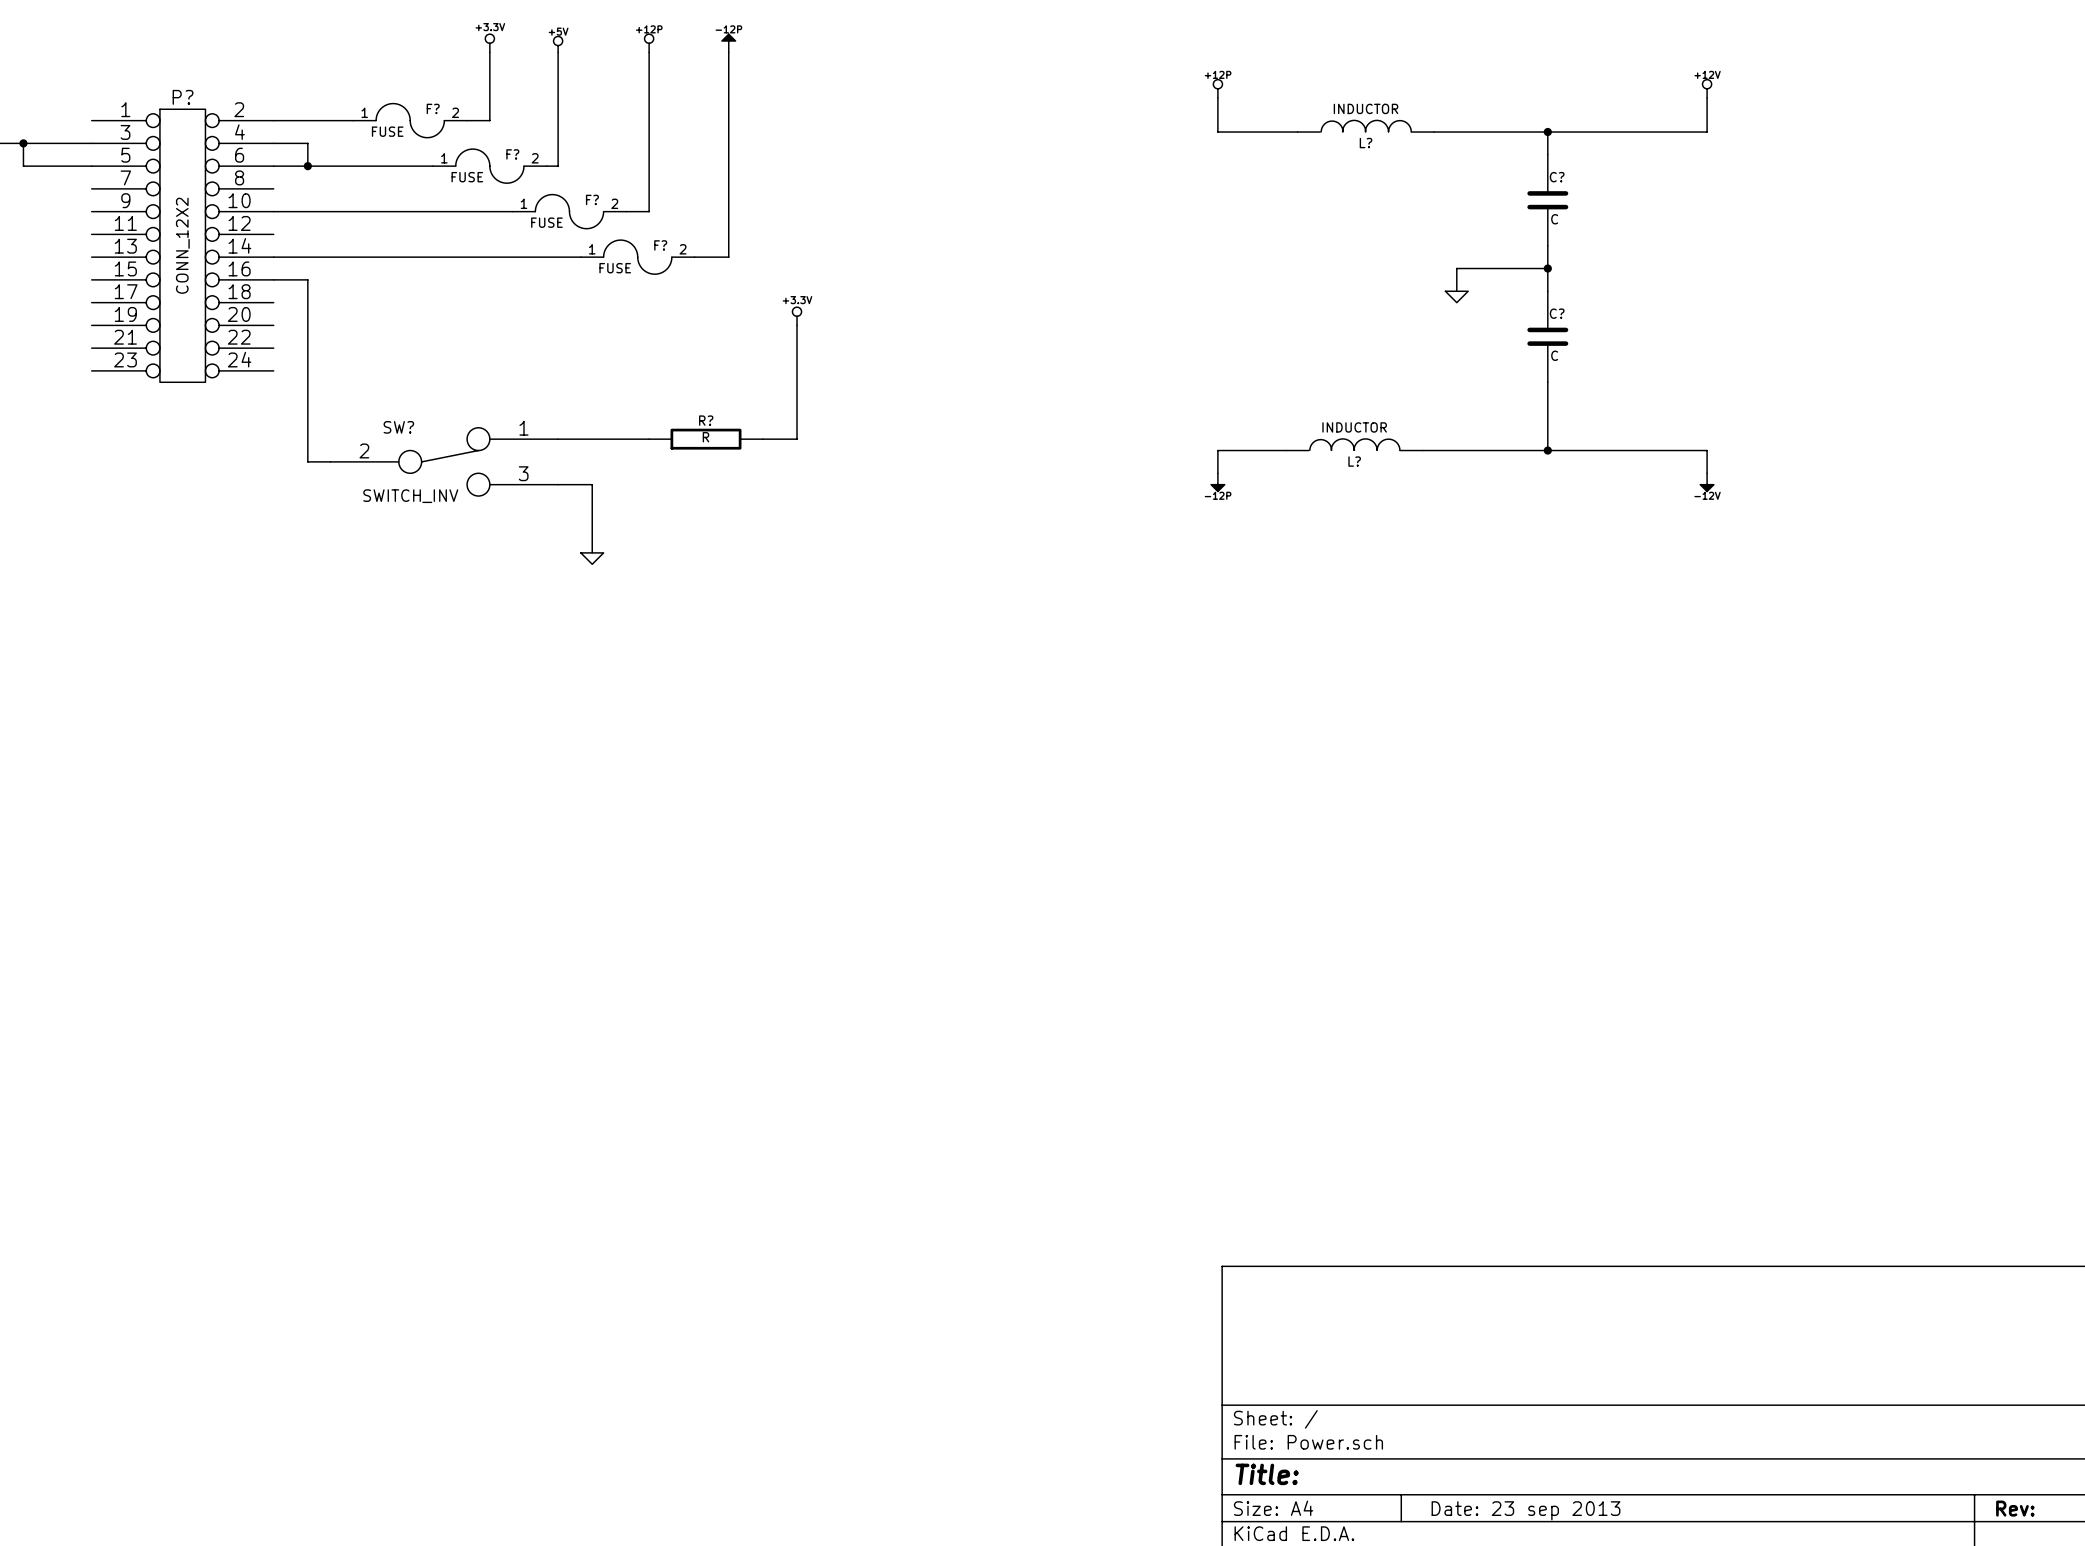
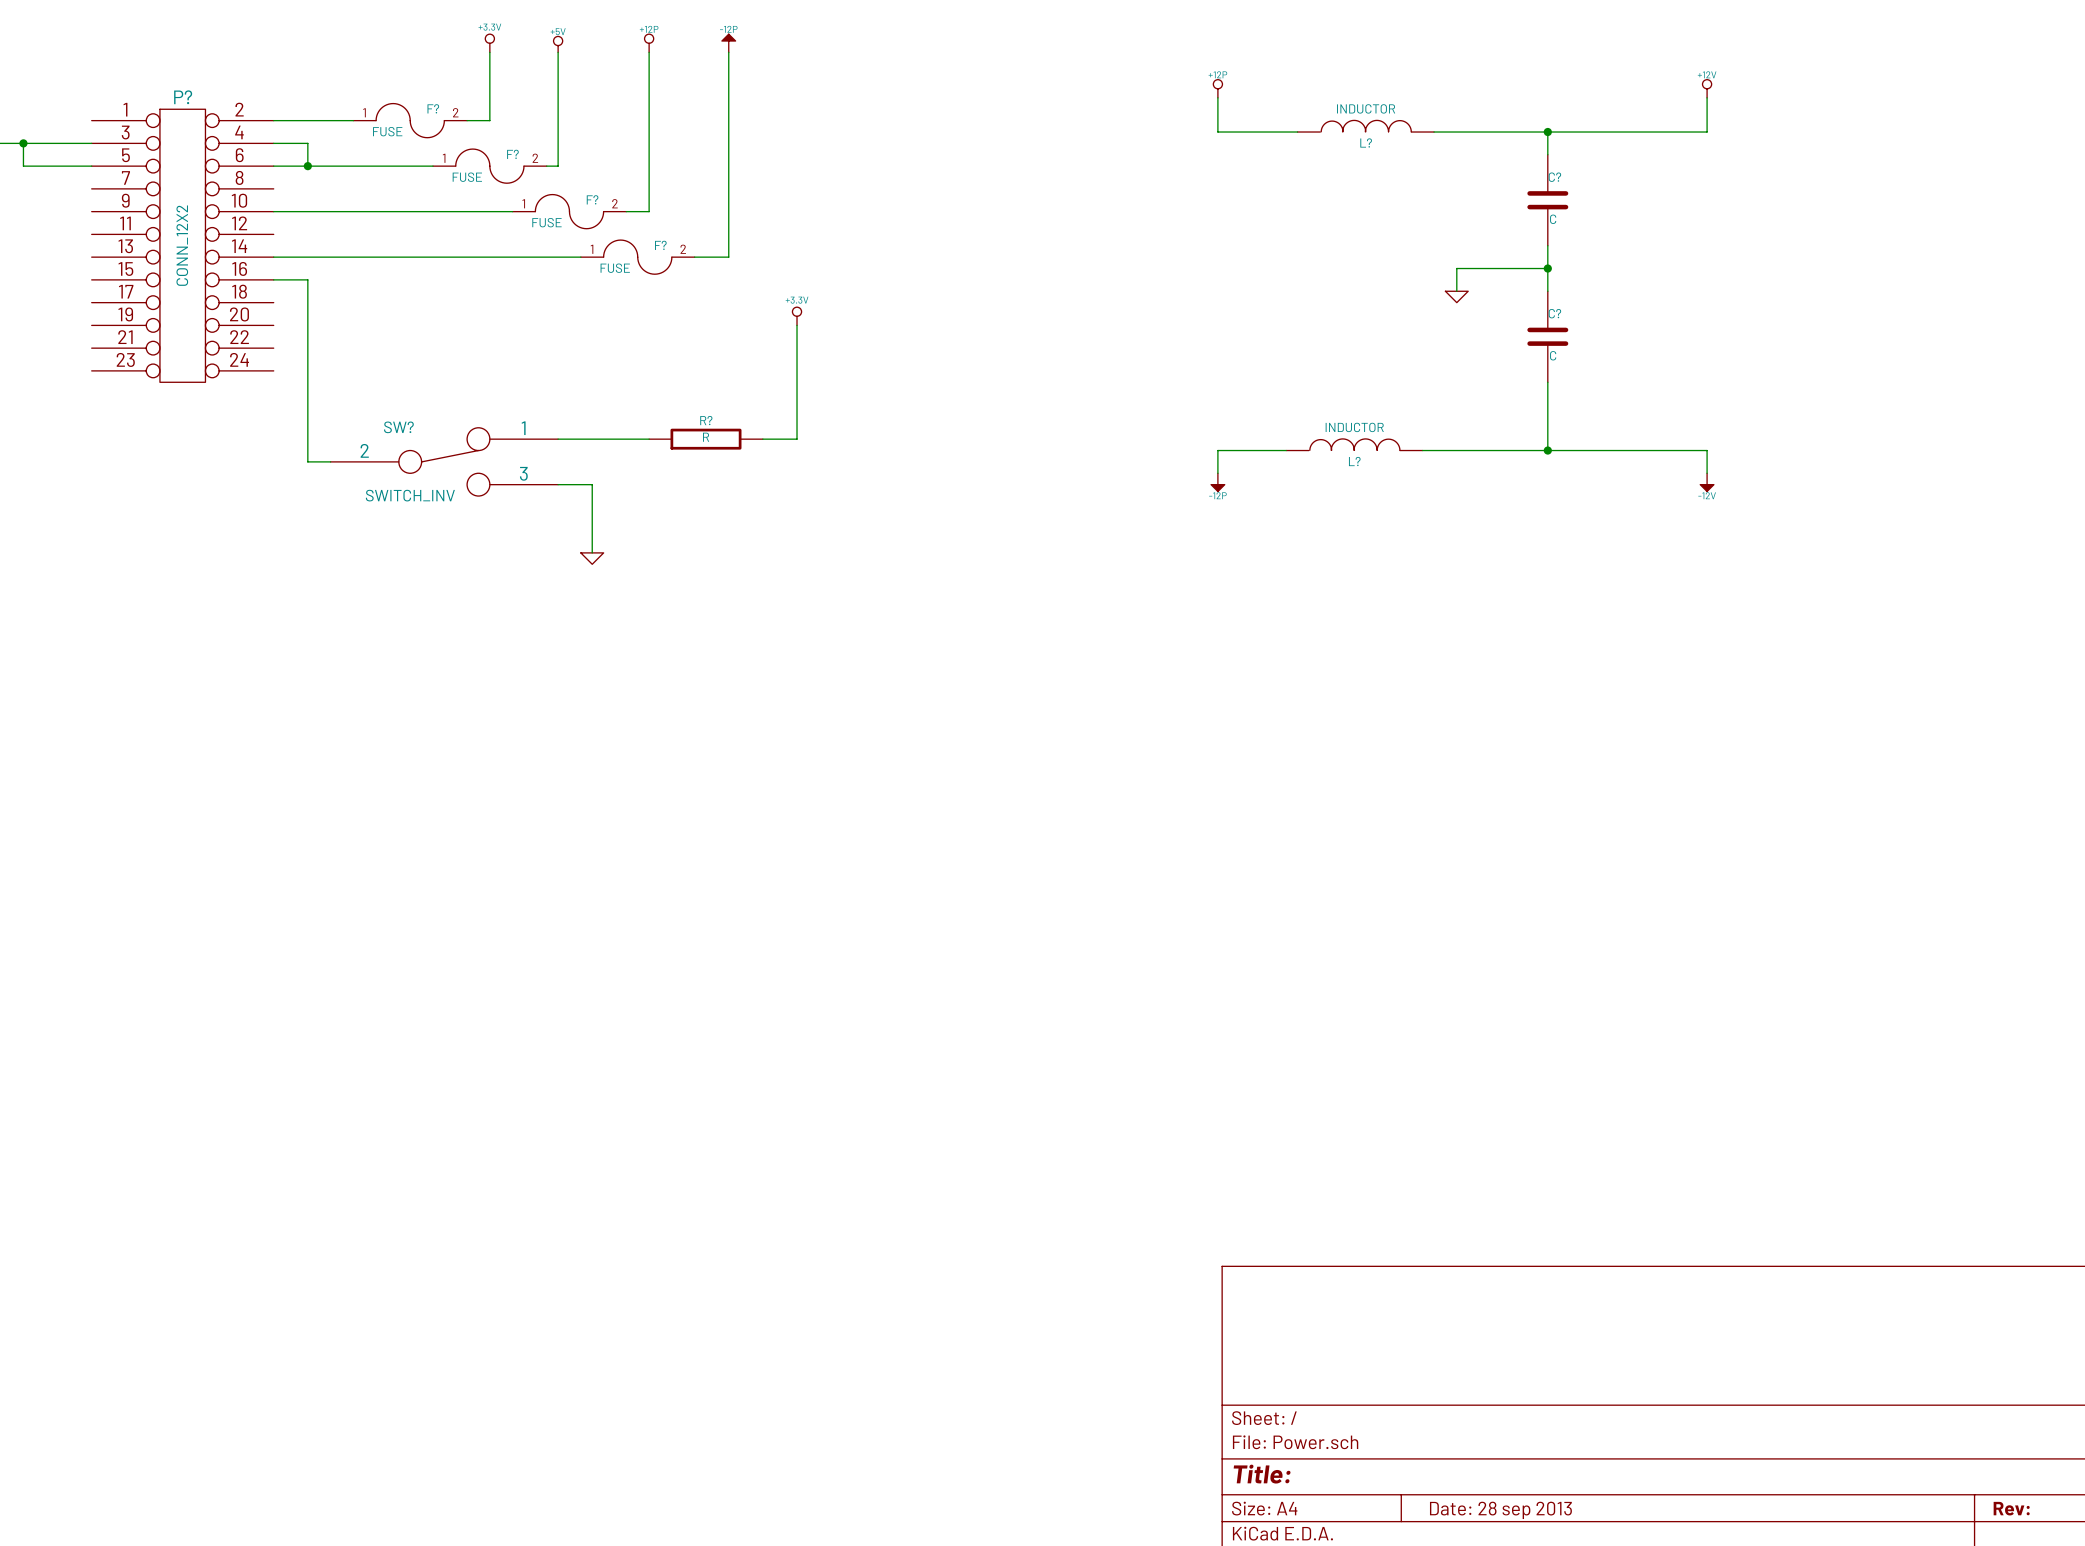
title block: Date: 23 sep 2013 (1525, 1510) -> Date: 28 sep 2013 (1500, 1510)

